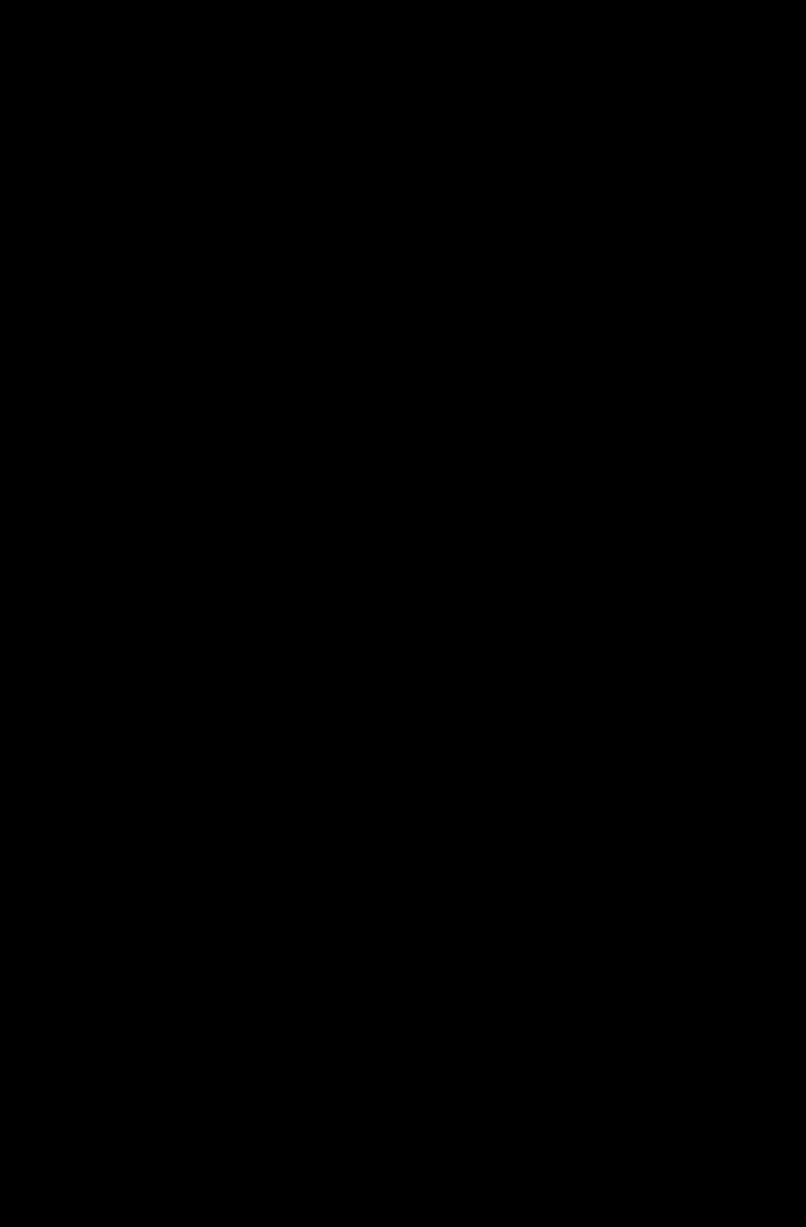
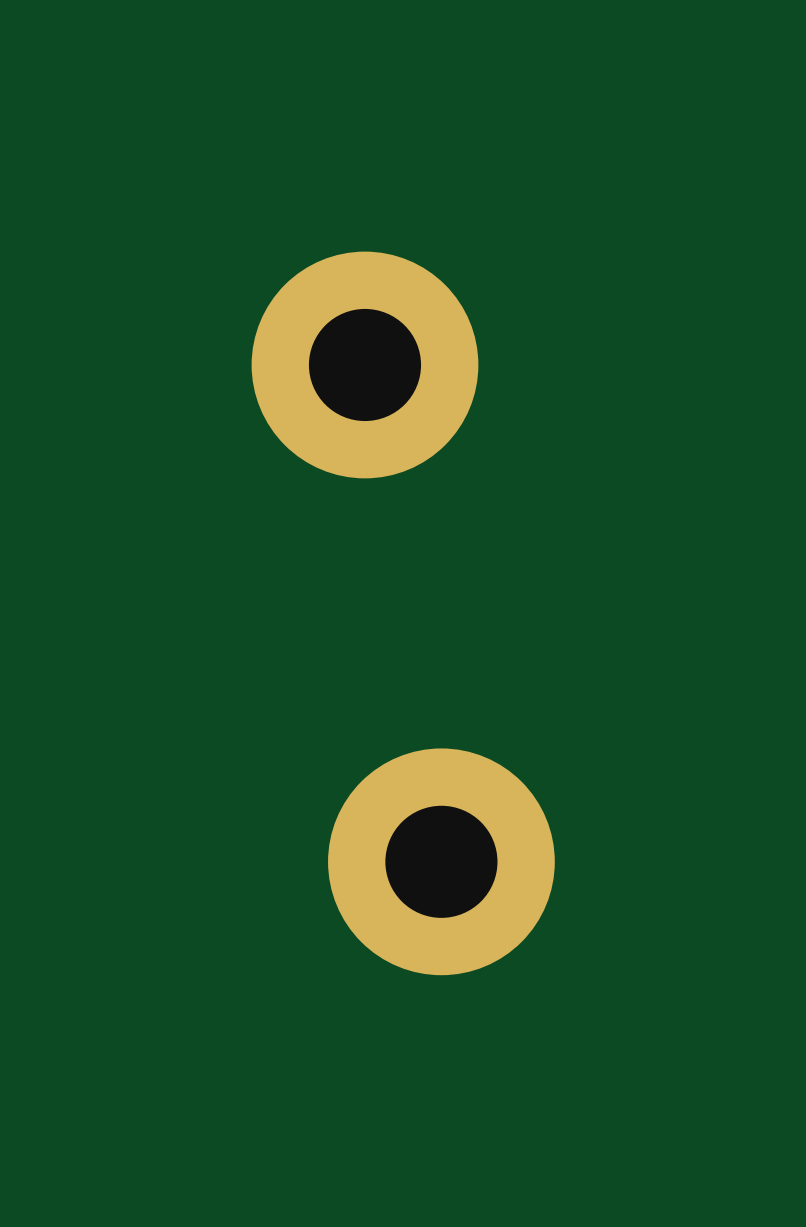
part: none -> (364, 364)
part: none -> (441, 861)

